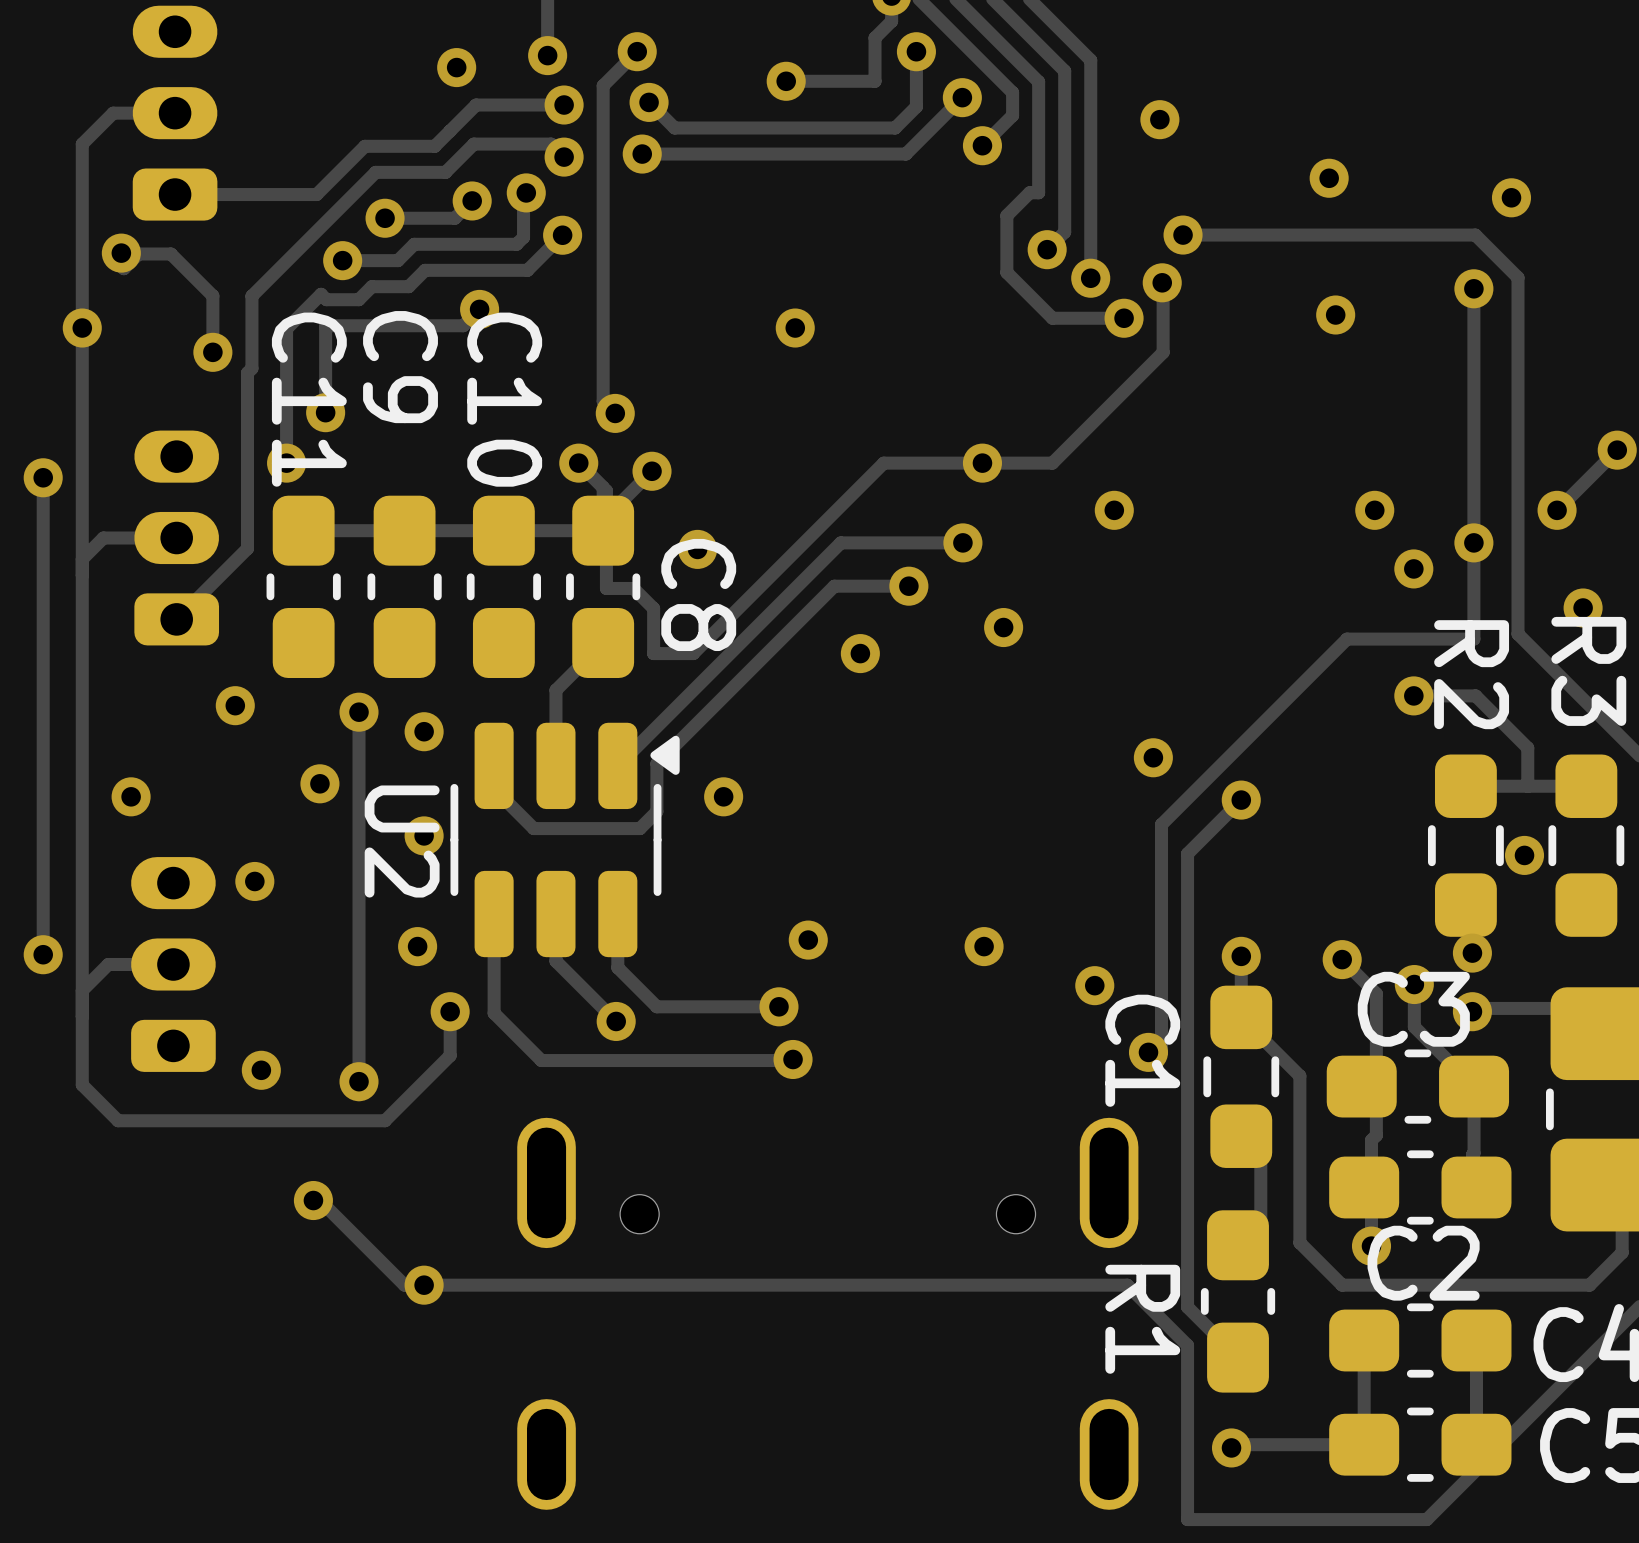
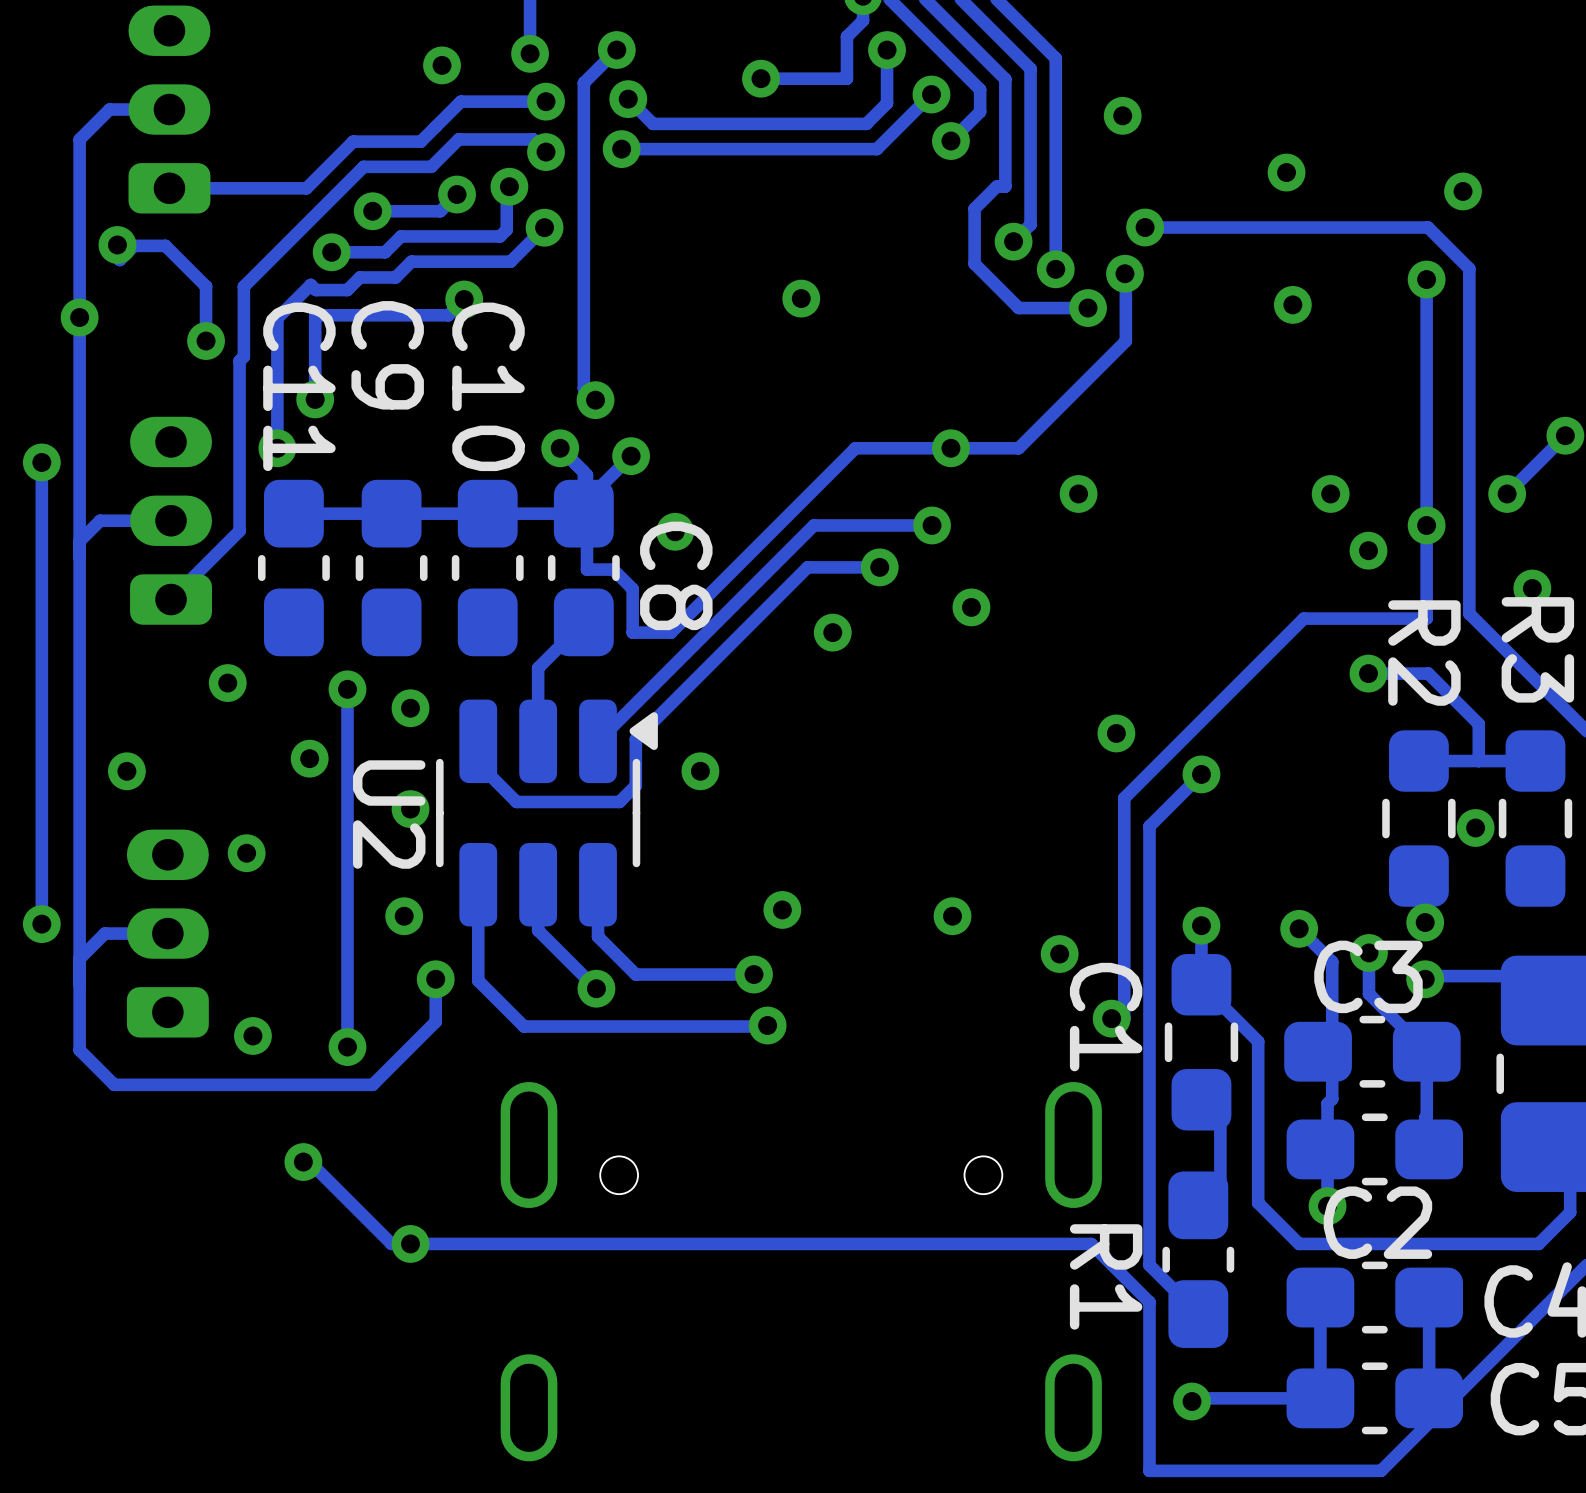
via position: (795, 328) -> (801, 298)

